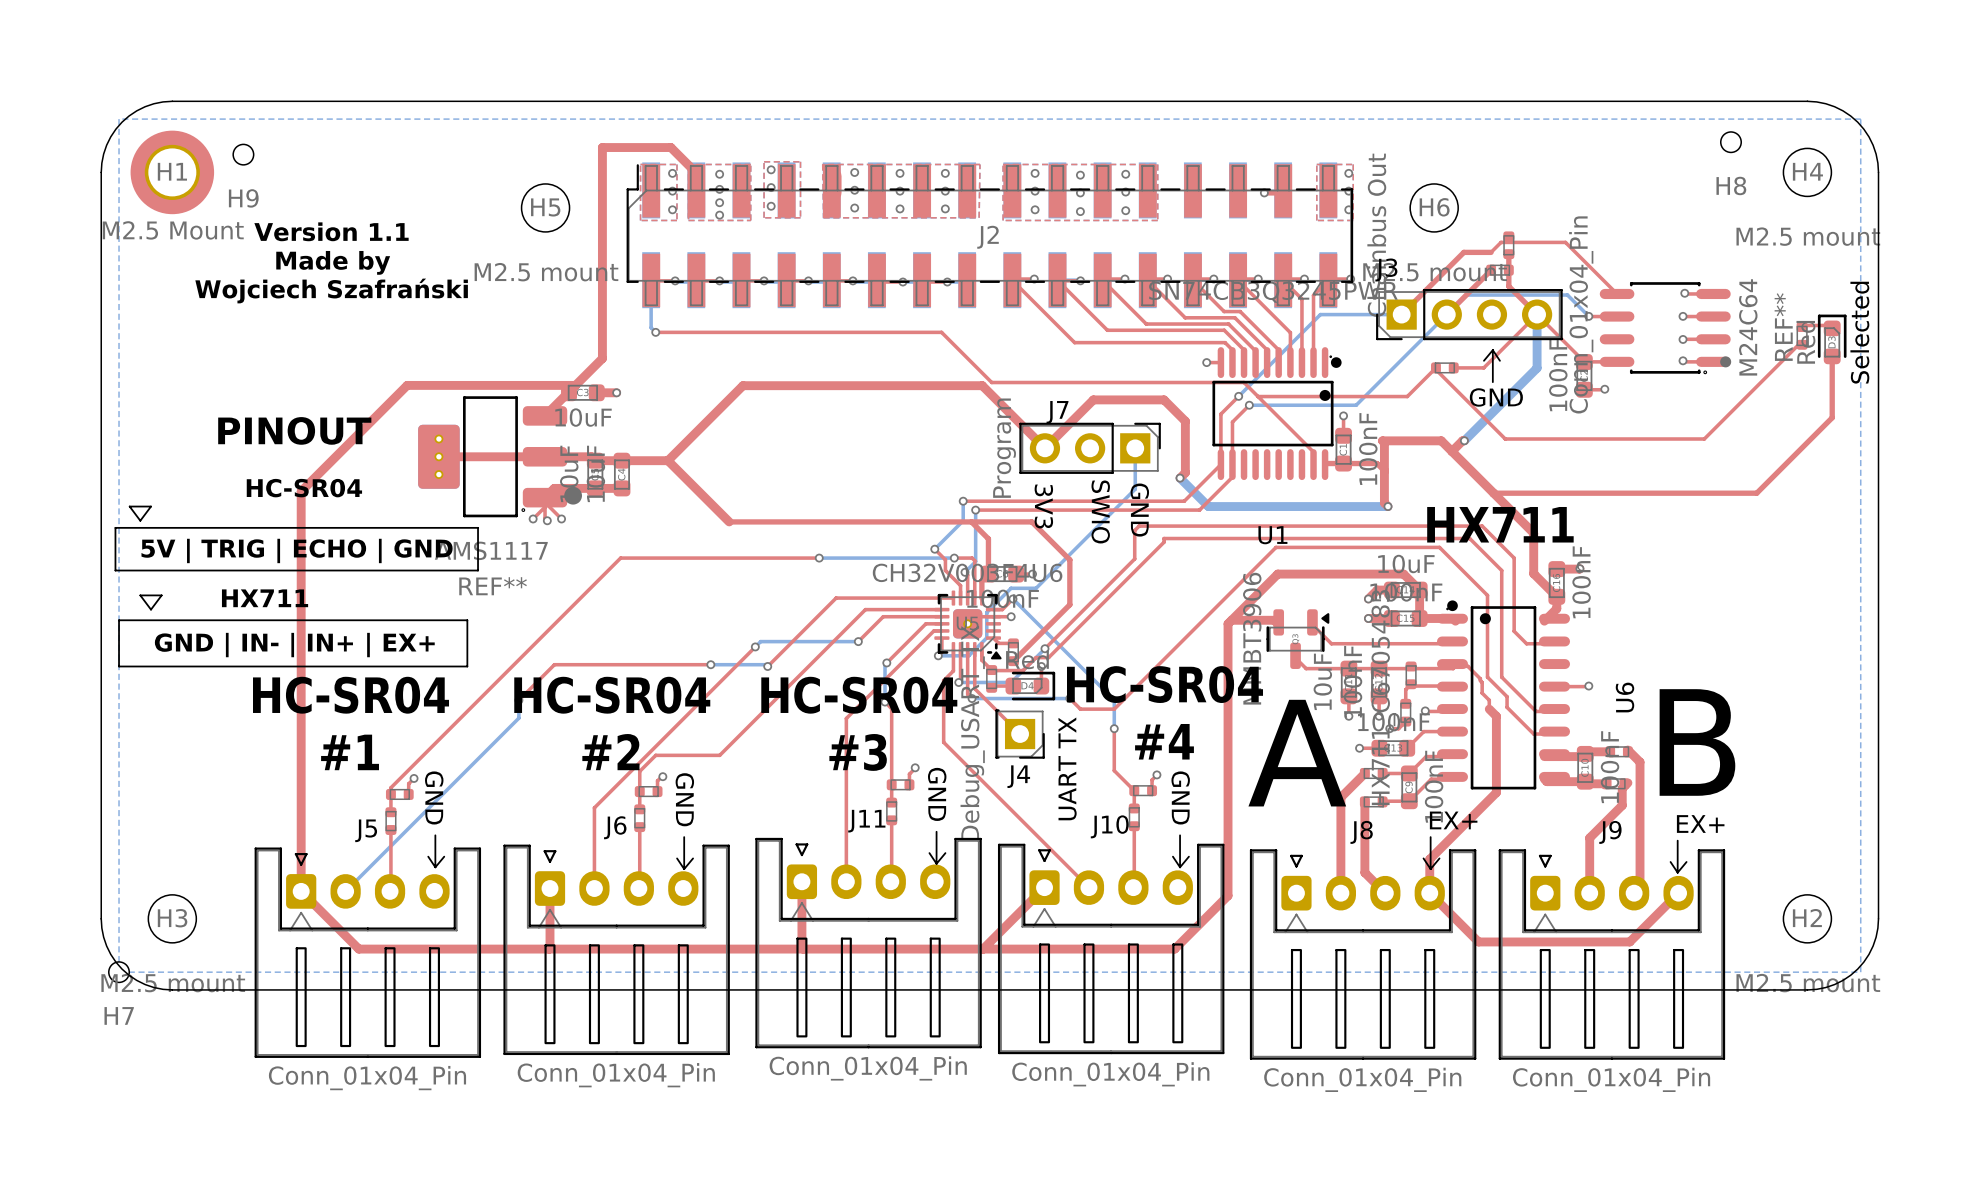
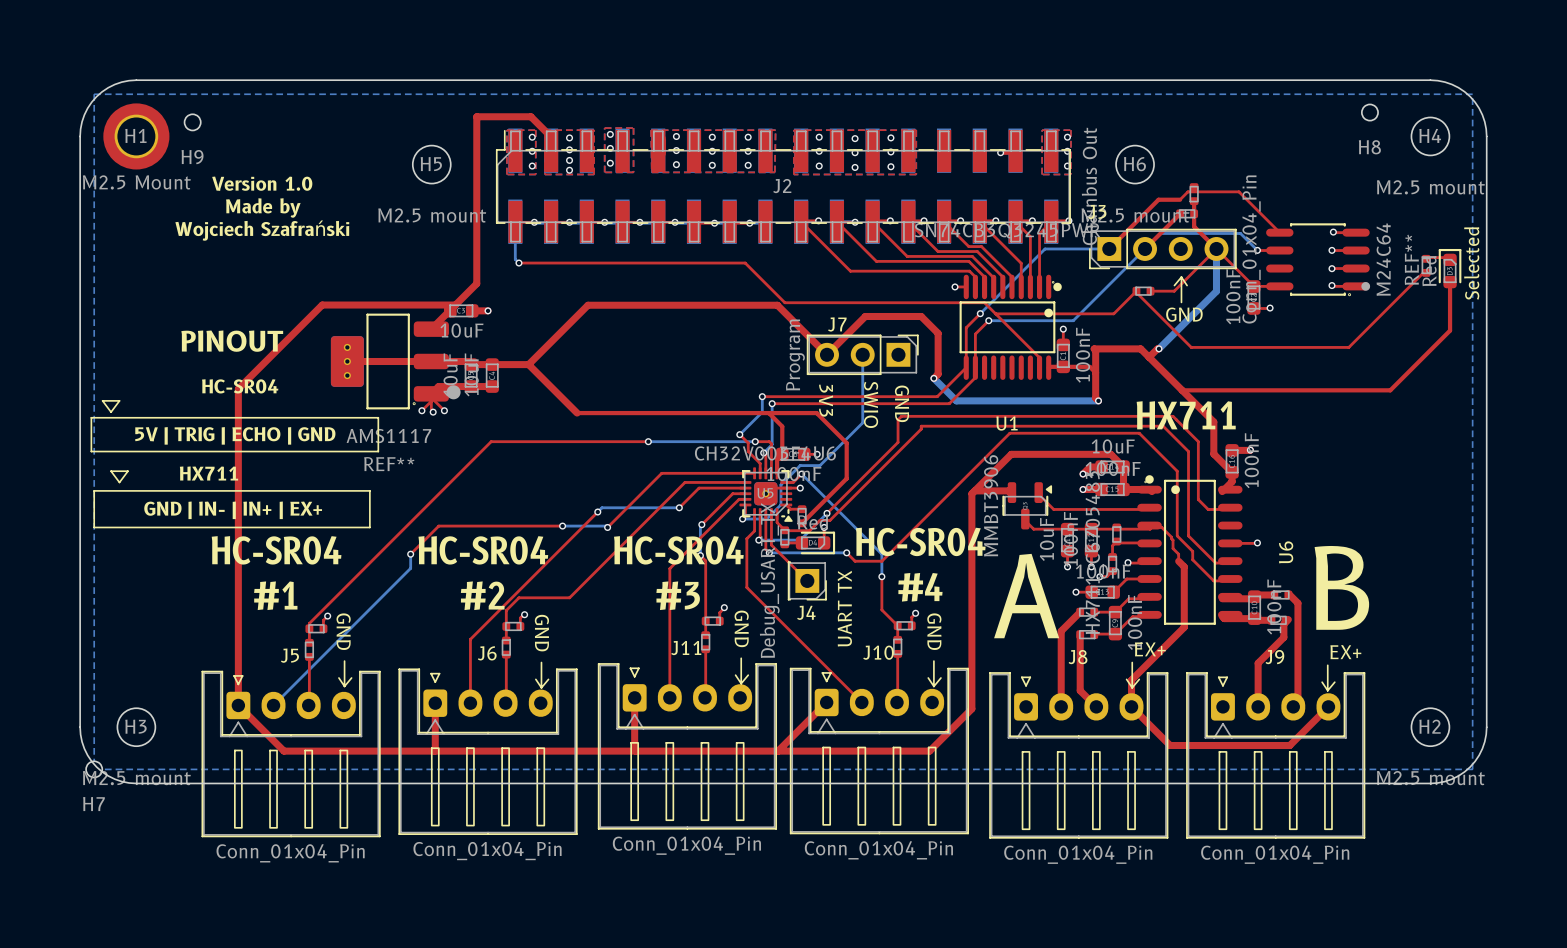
text: Version 1.1 (331, 231) -> Version 1.0 (262, 183)
bottom track: (1135, 448) (1135, 489) (1090, 534) -> (862, 354) (862, 422)

